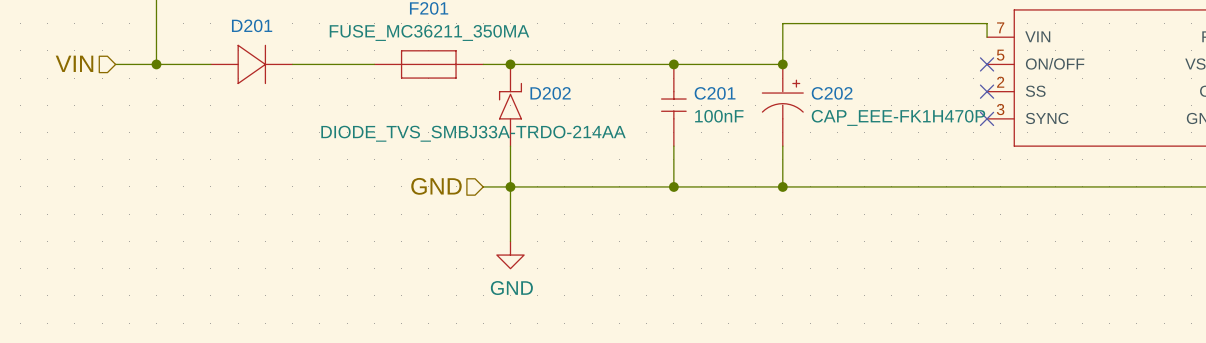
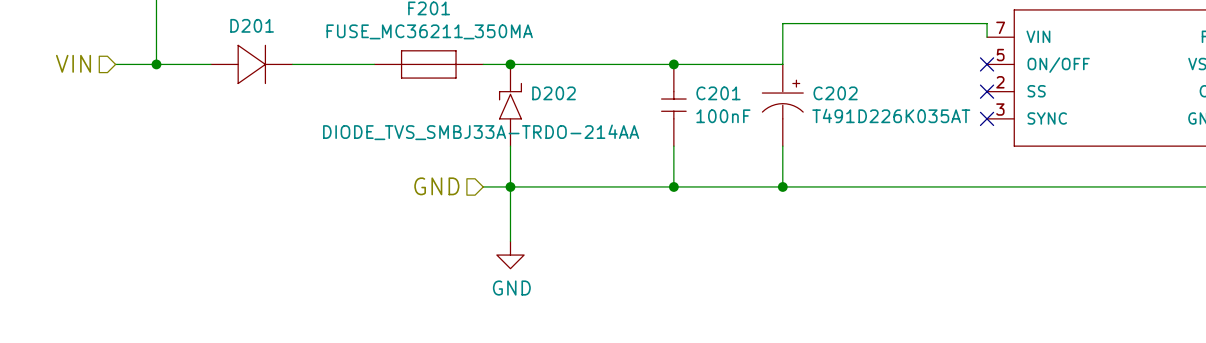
junction: (782, 64) -> none
C202 value: CAP_EEE-FK1H470P (898, 117) -> T491D226K035AT (891, 115)

